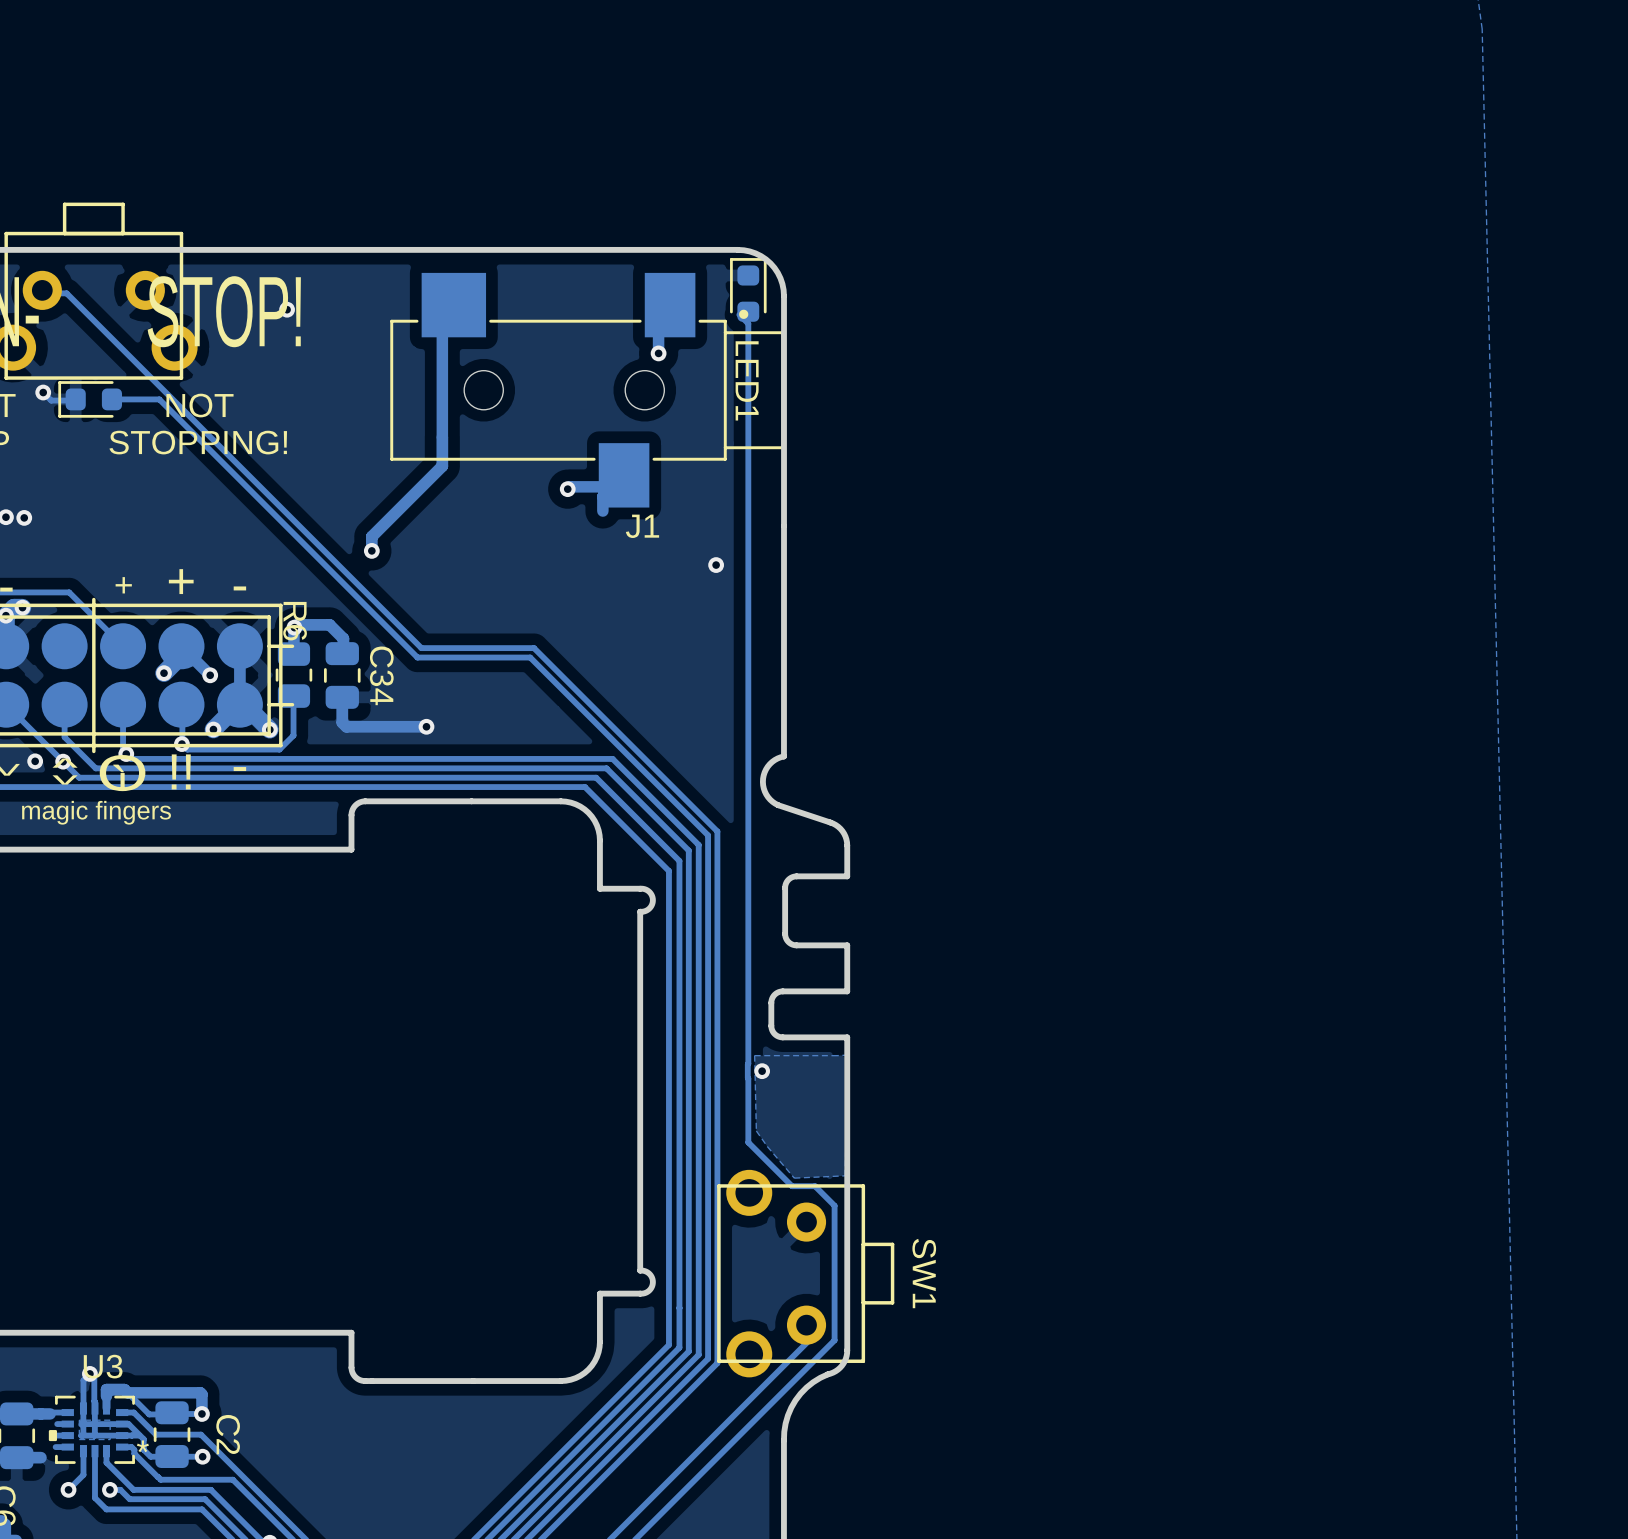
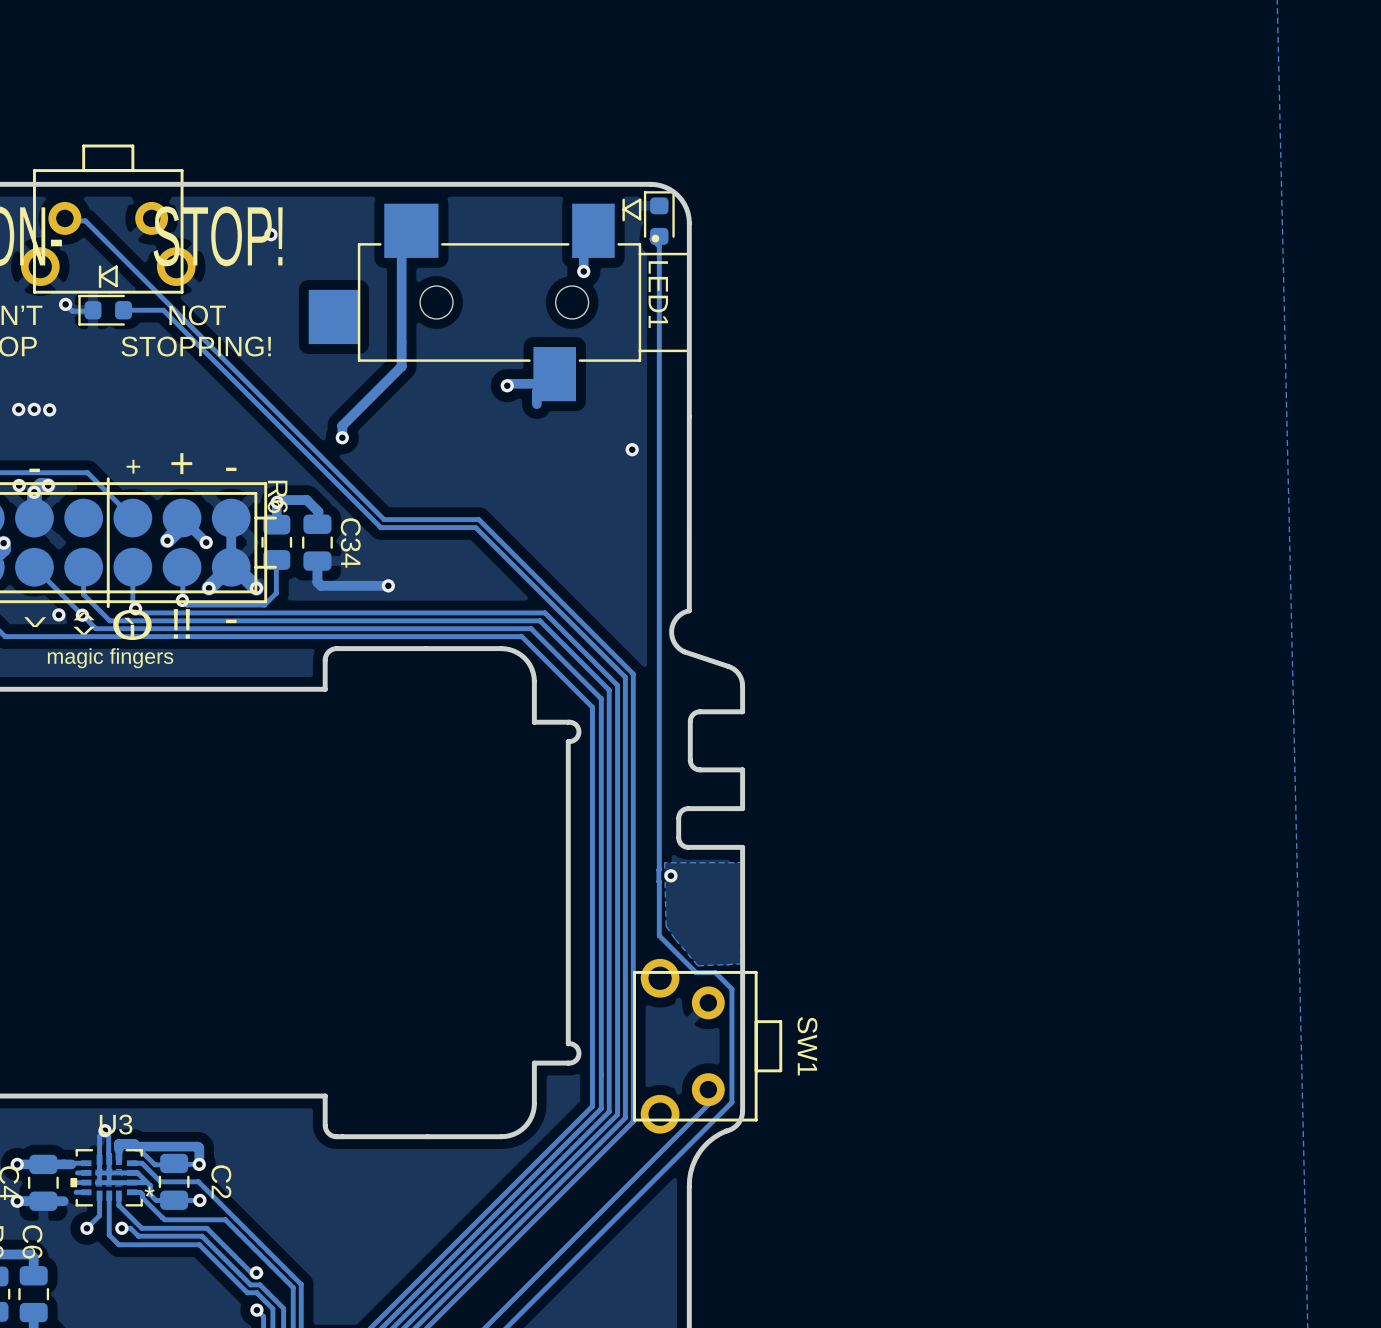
line: none -> (623, 199) (623, 220)
line: none -> (624, 209) (640, 219) (640, 199) (623, 209)
line: none -> (100, 266) (100, 286)
line: none -> (101, 276) (116, 286) (116, 266) (100, 276)
part: none -> (499, 302)
J1: (587, 390) -> none

